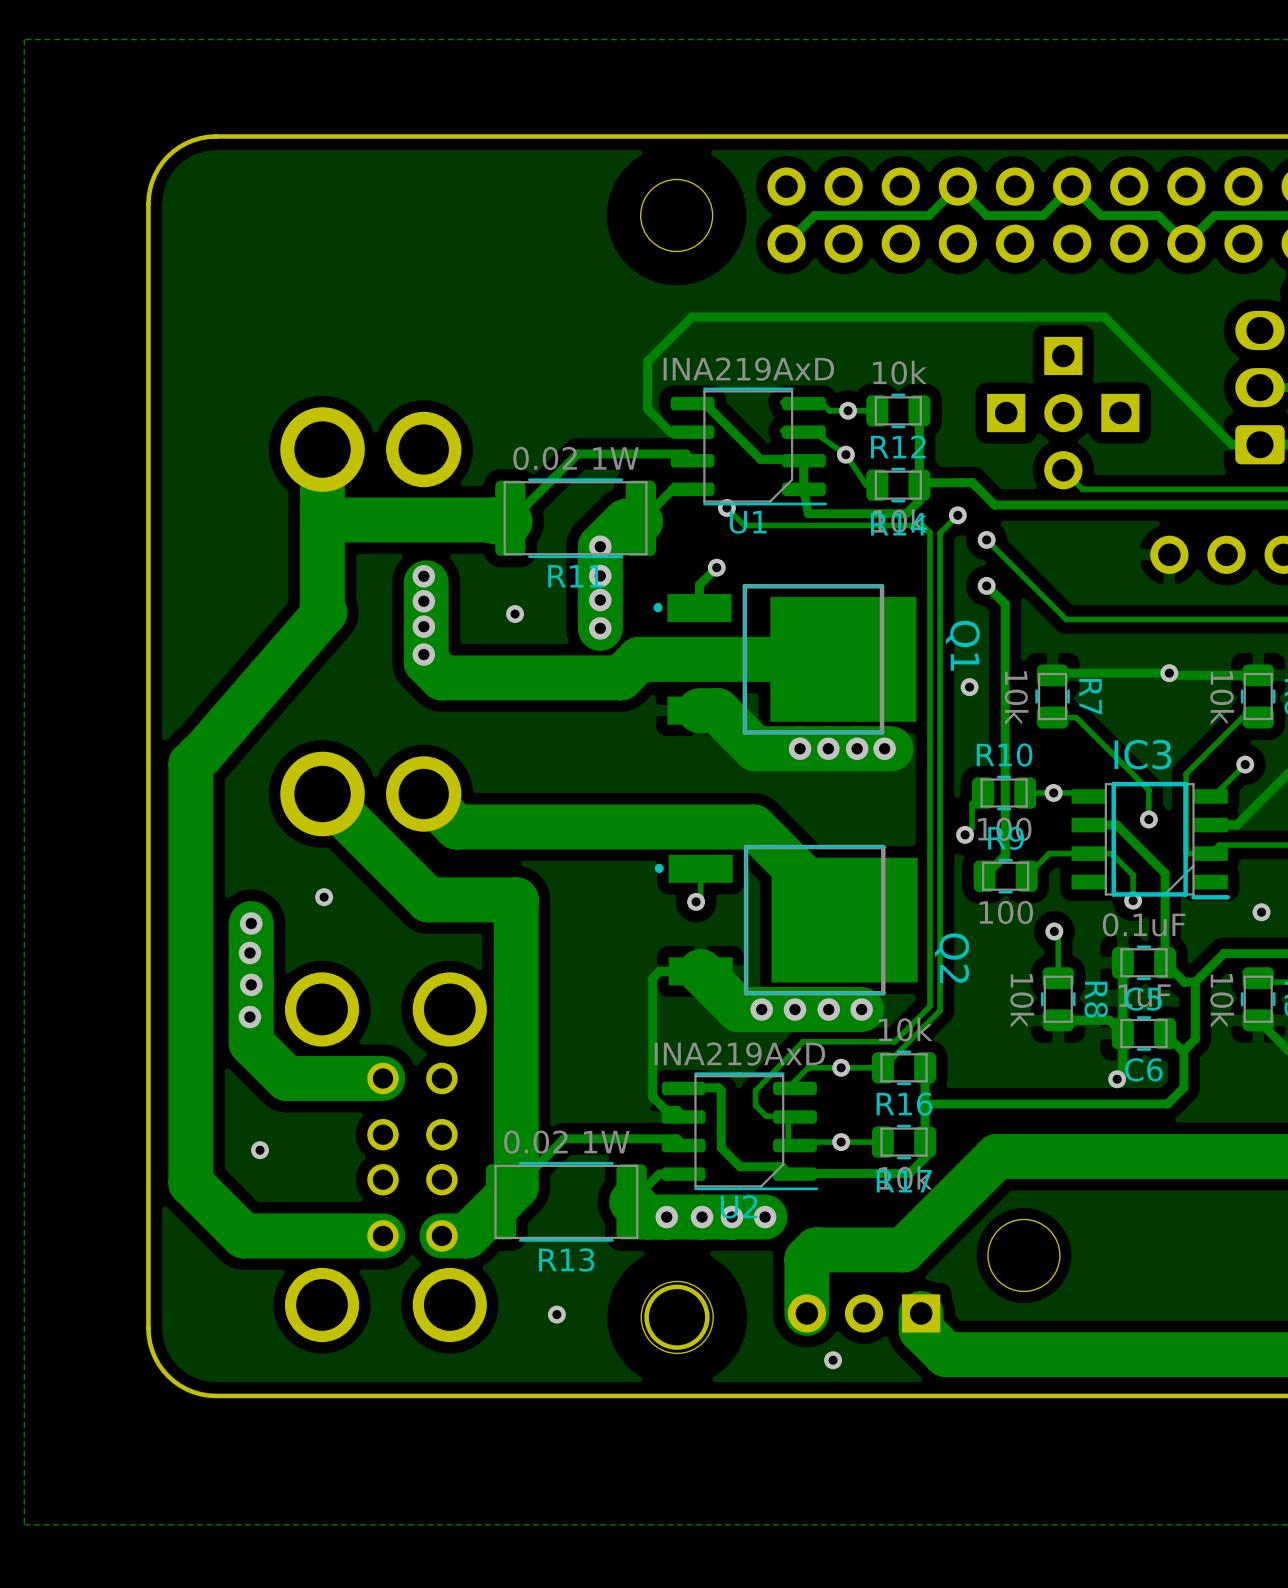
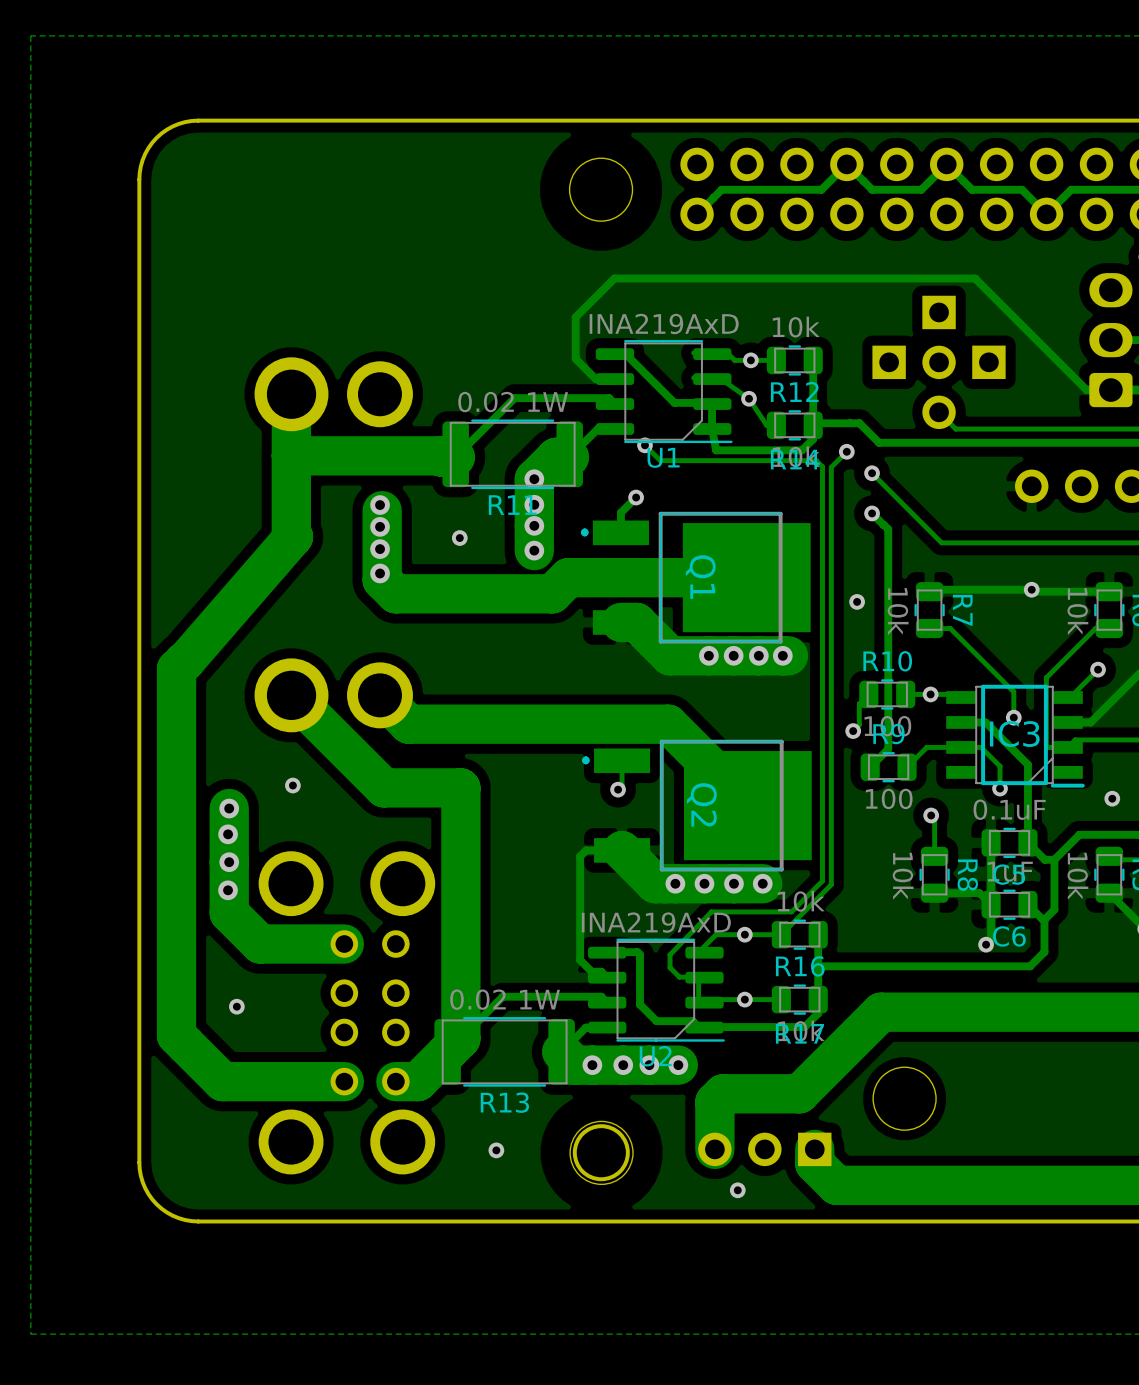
Q1 name position: Q1 (962, 645) -> Q1 (700, 577)
IC3 name position: IC3 (1142, 754) -> IC3 (1014, 734)
Q2 name position: Q2 (951, 958) -> Q2 (701, 804)

